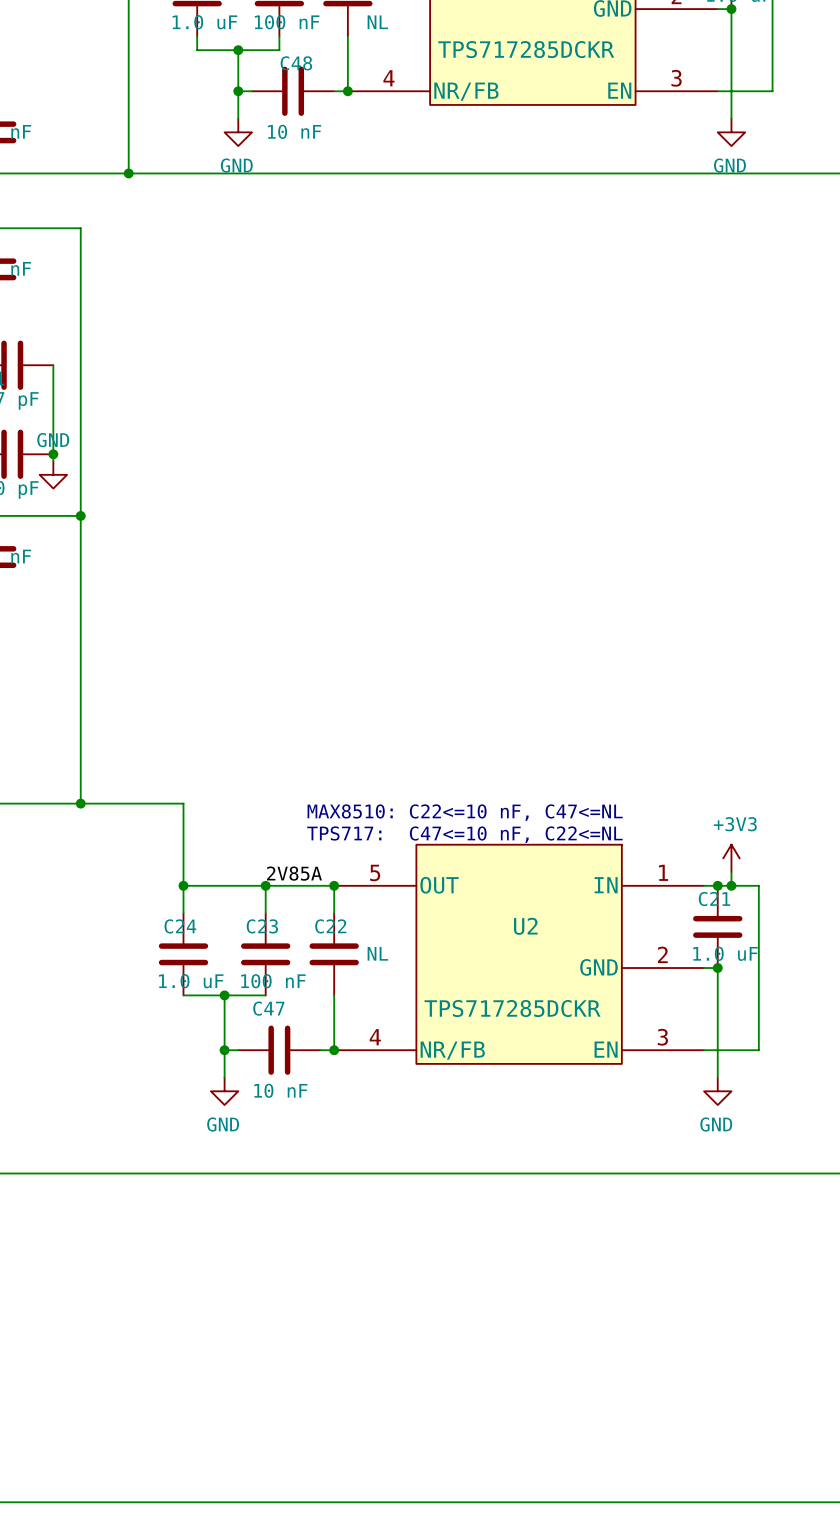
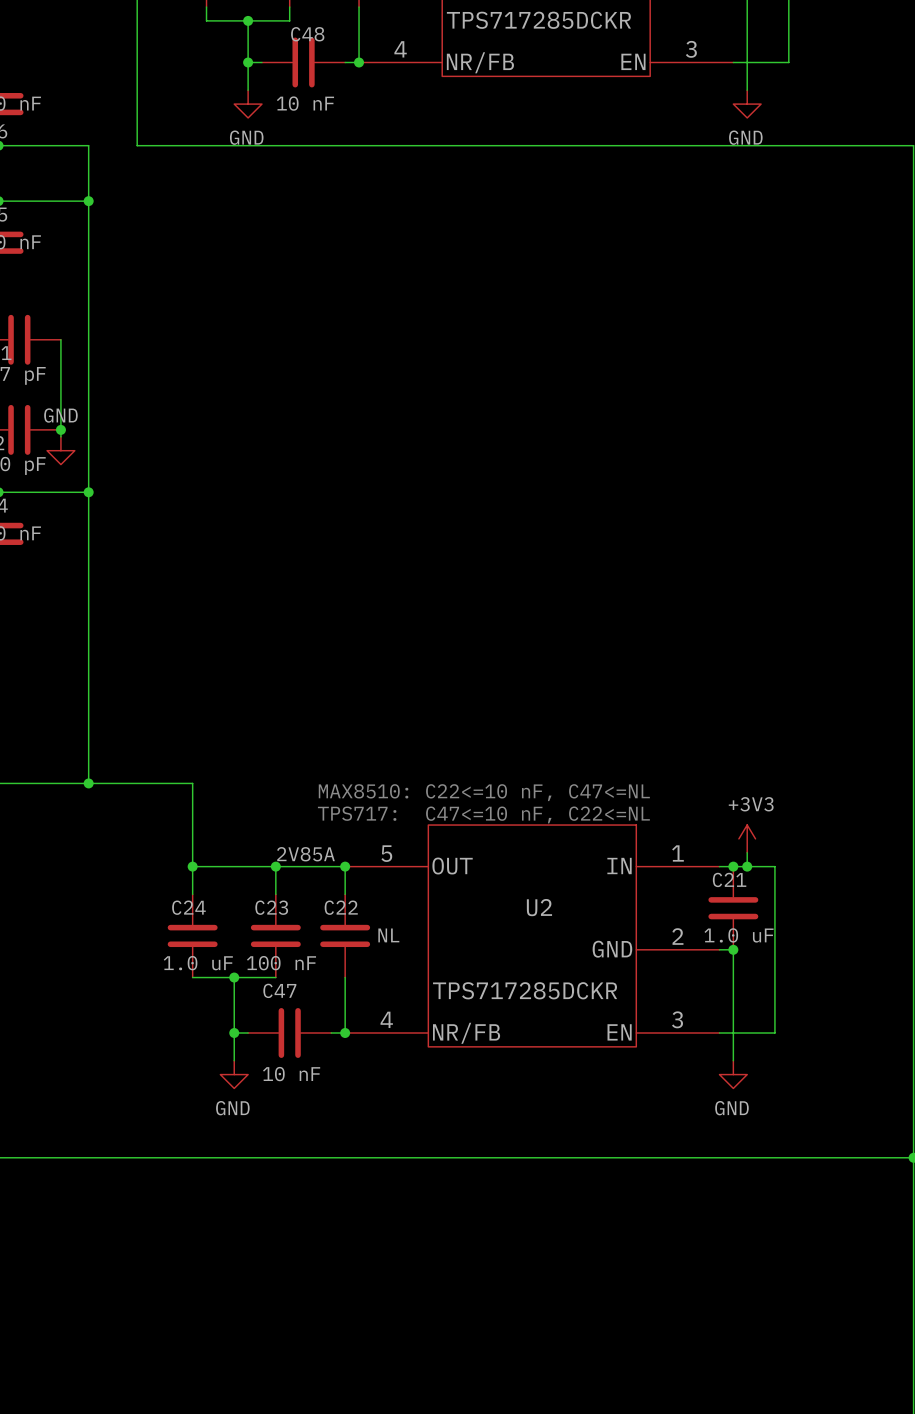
wire: (80, 173) (128, 173) -> (88, 145) (88, 201)
junction: (128, 173) -> none
junction: none -> (88, 201)

